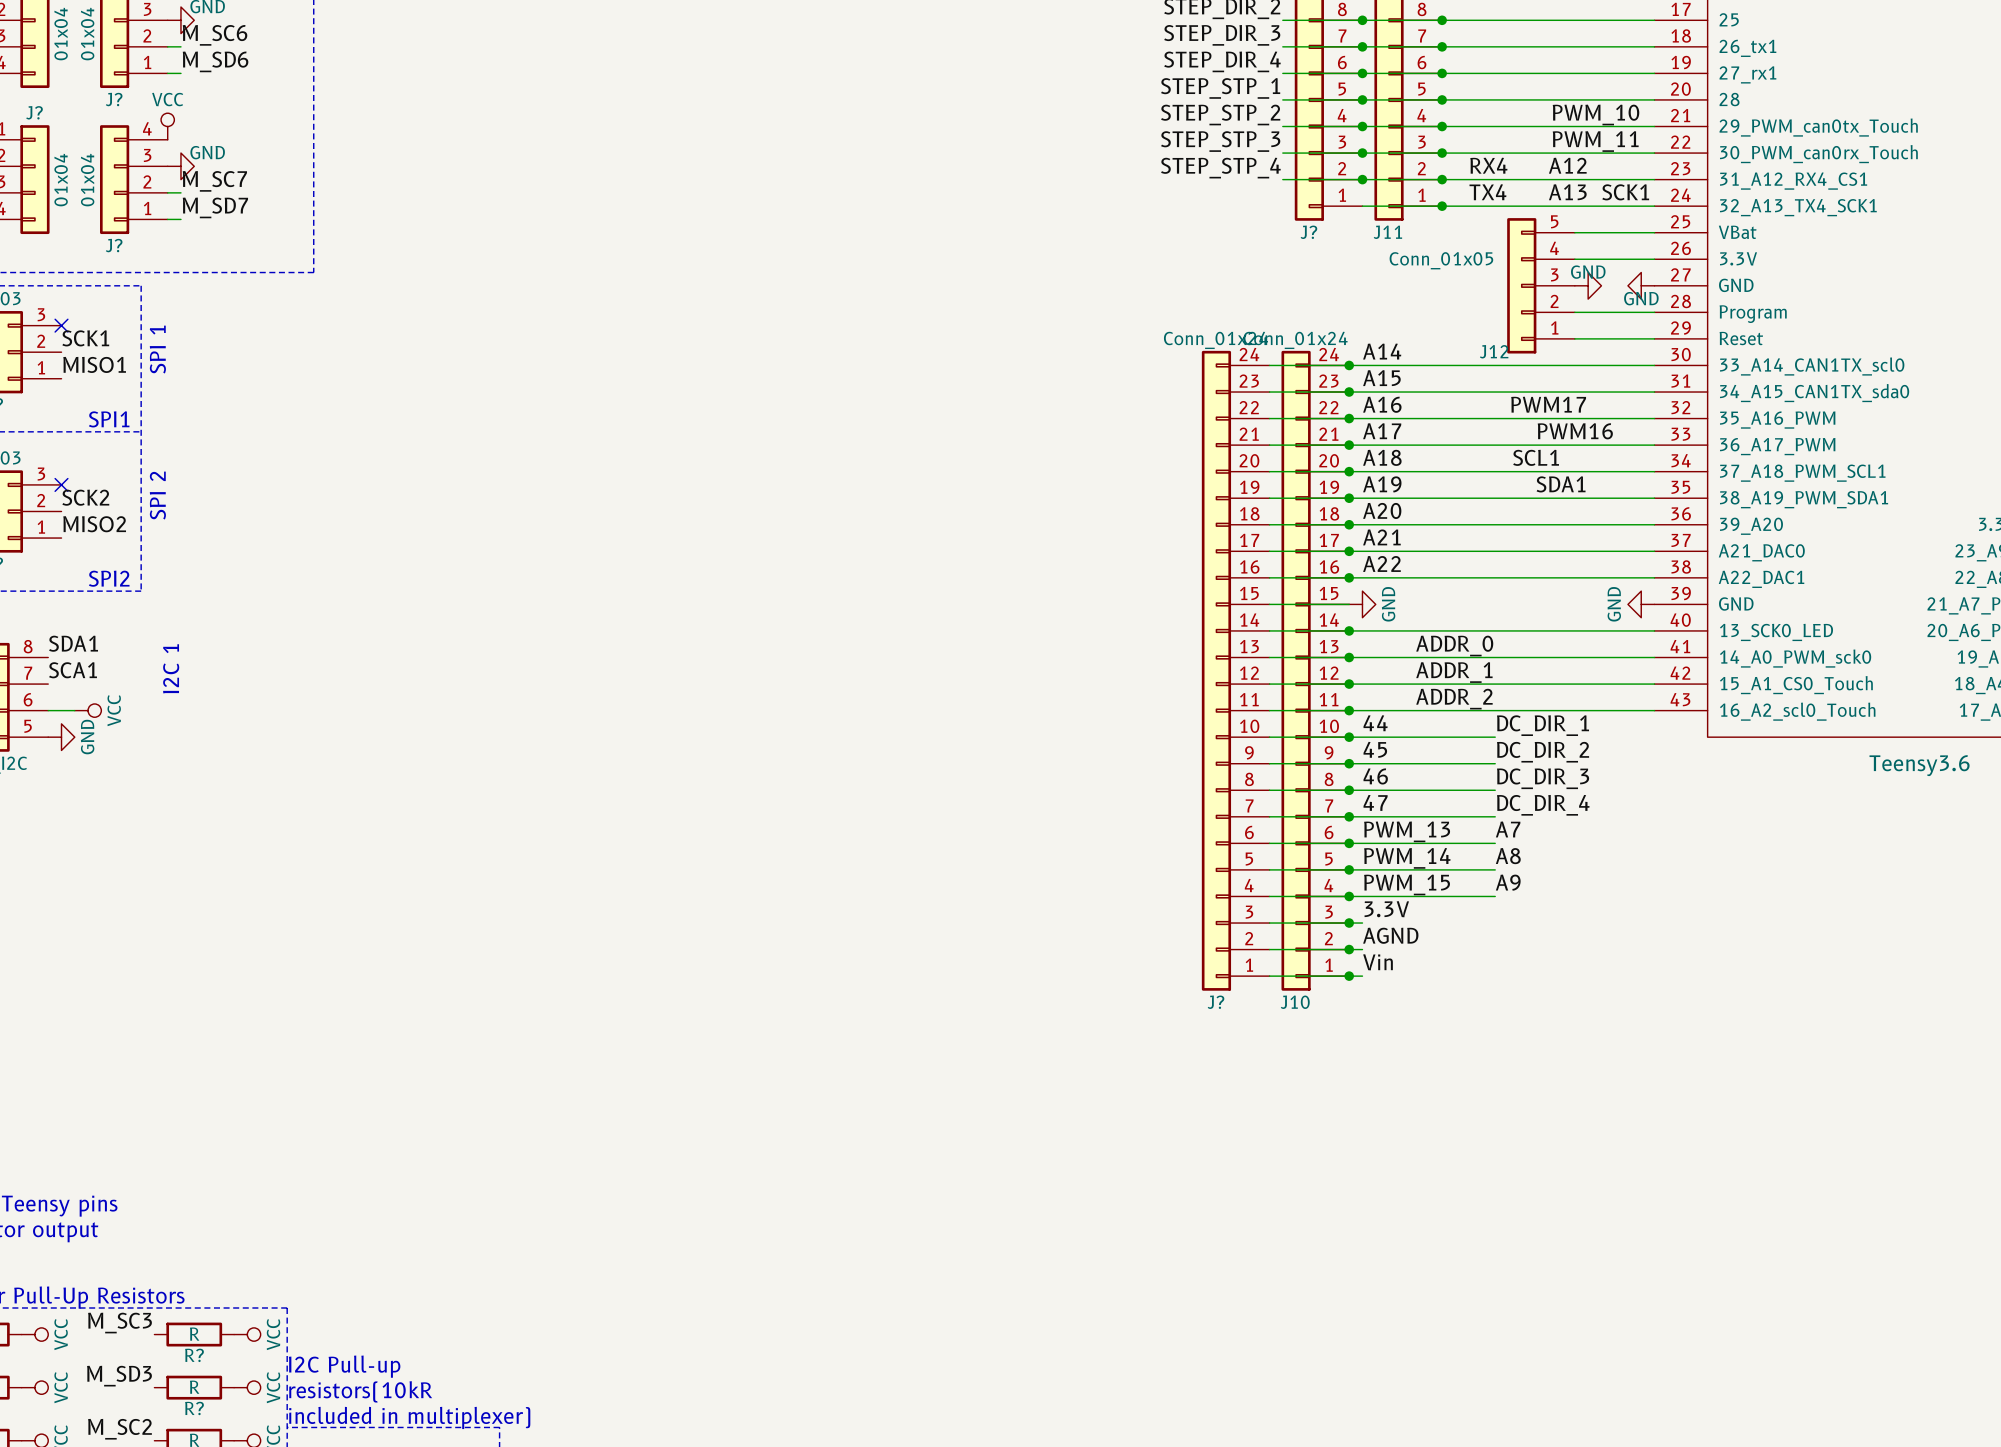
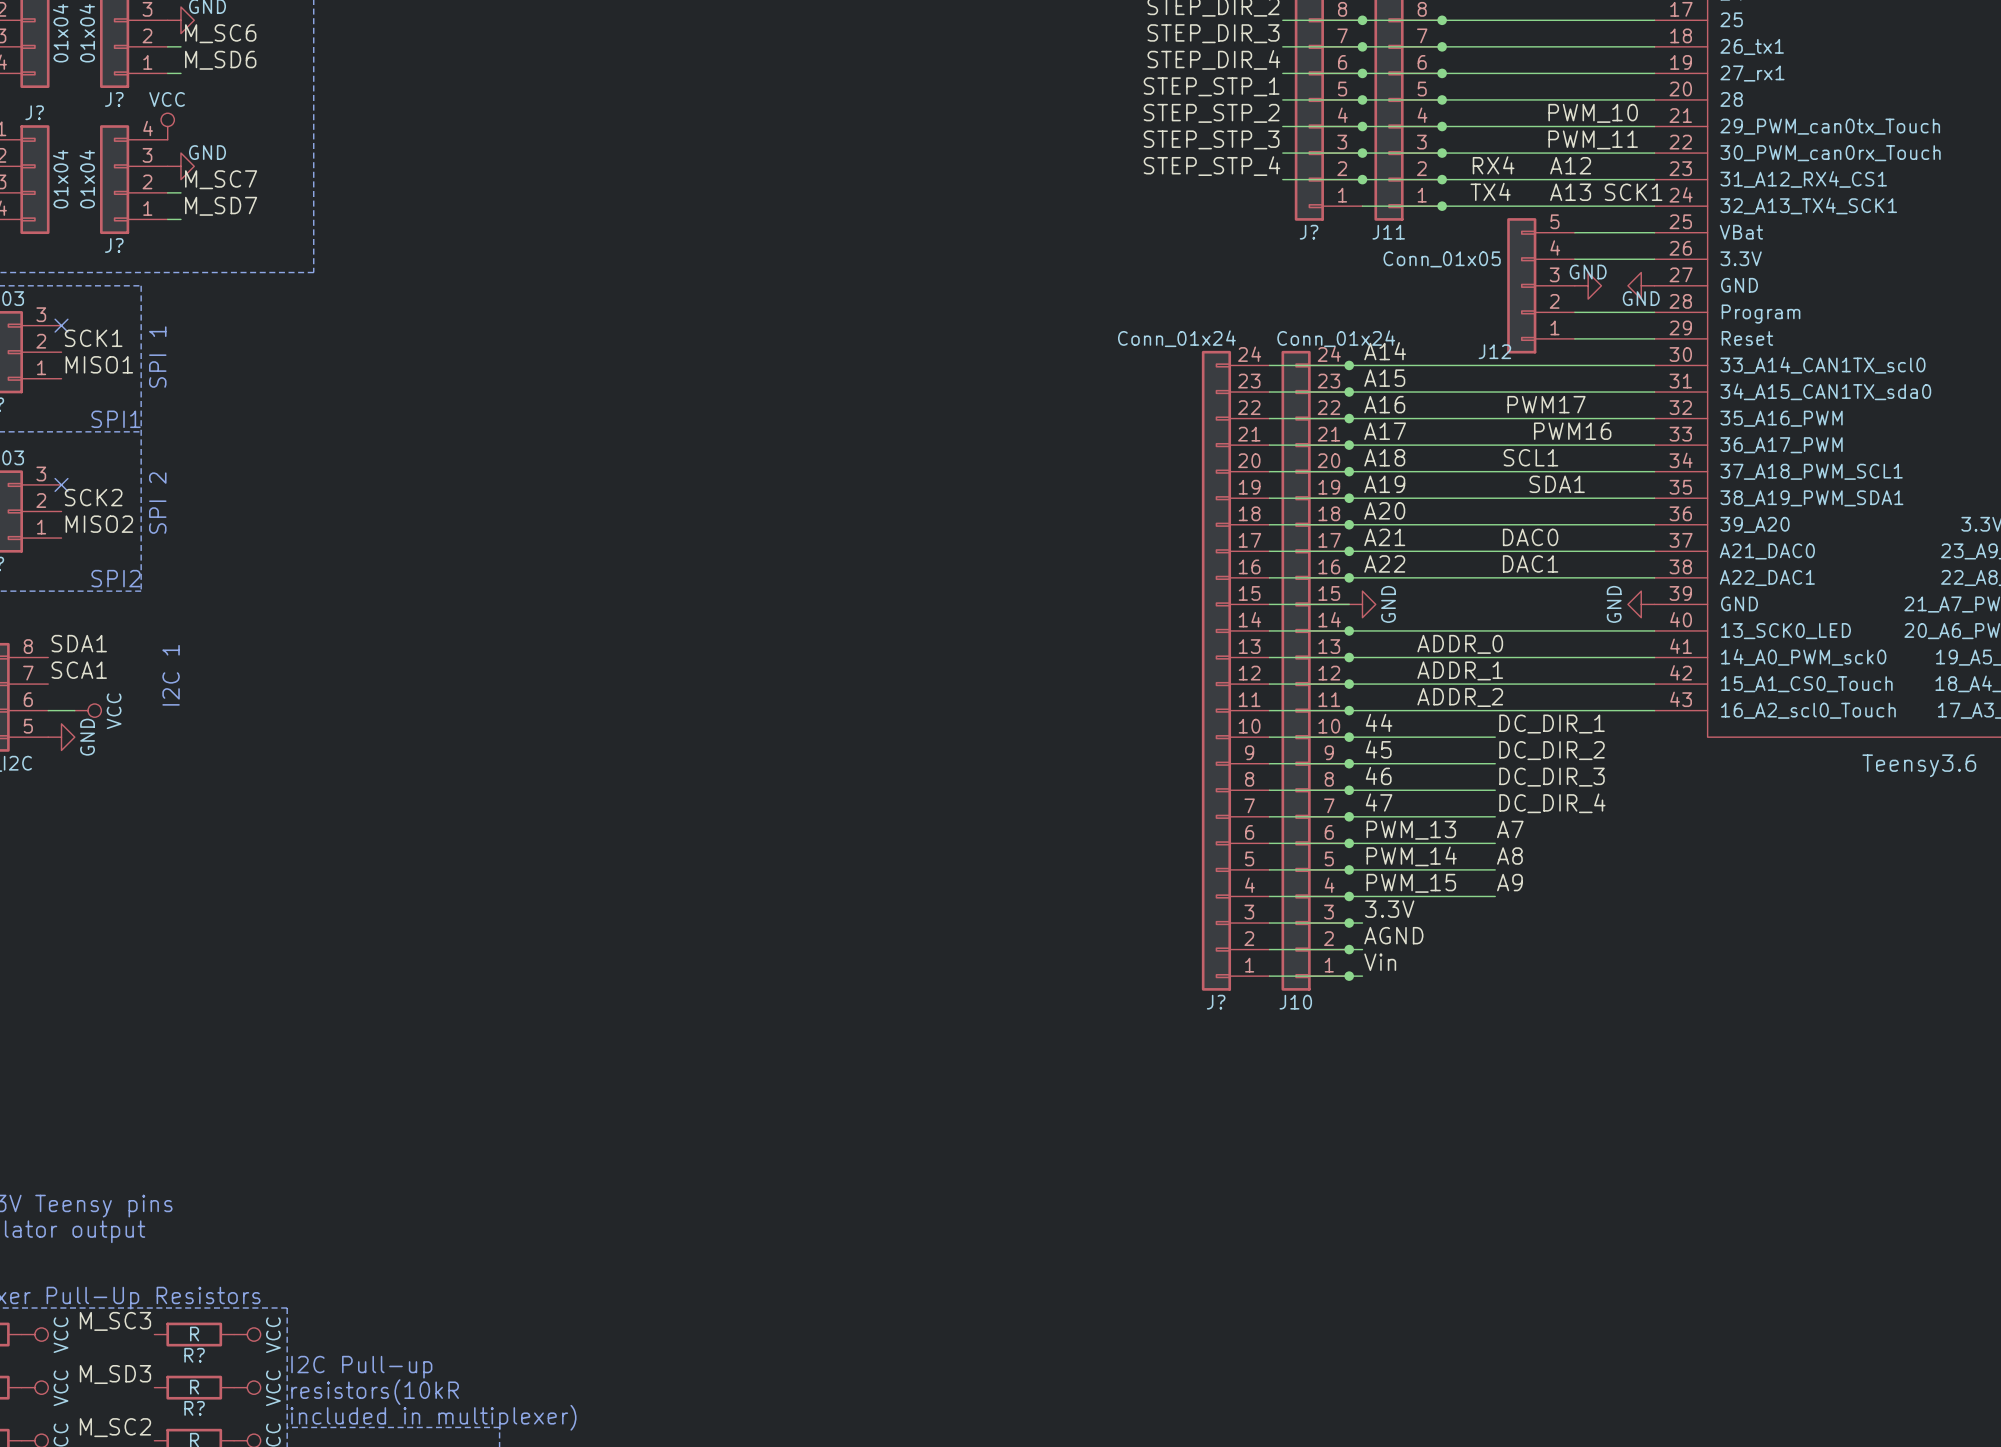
J? value position: Conn_01x24 (1215, 340) -> Conn_01x24 (1176, 338)
J10 value position: Conn_01x24 (1295, 340) -> Conn_01x24 (1336, 338)
label: none -> DAC0 (1530, 537)
label: none -> DAC1 (1530, 563)

